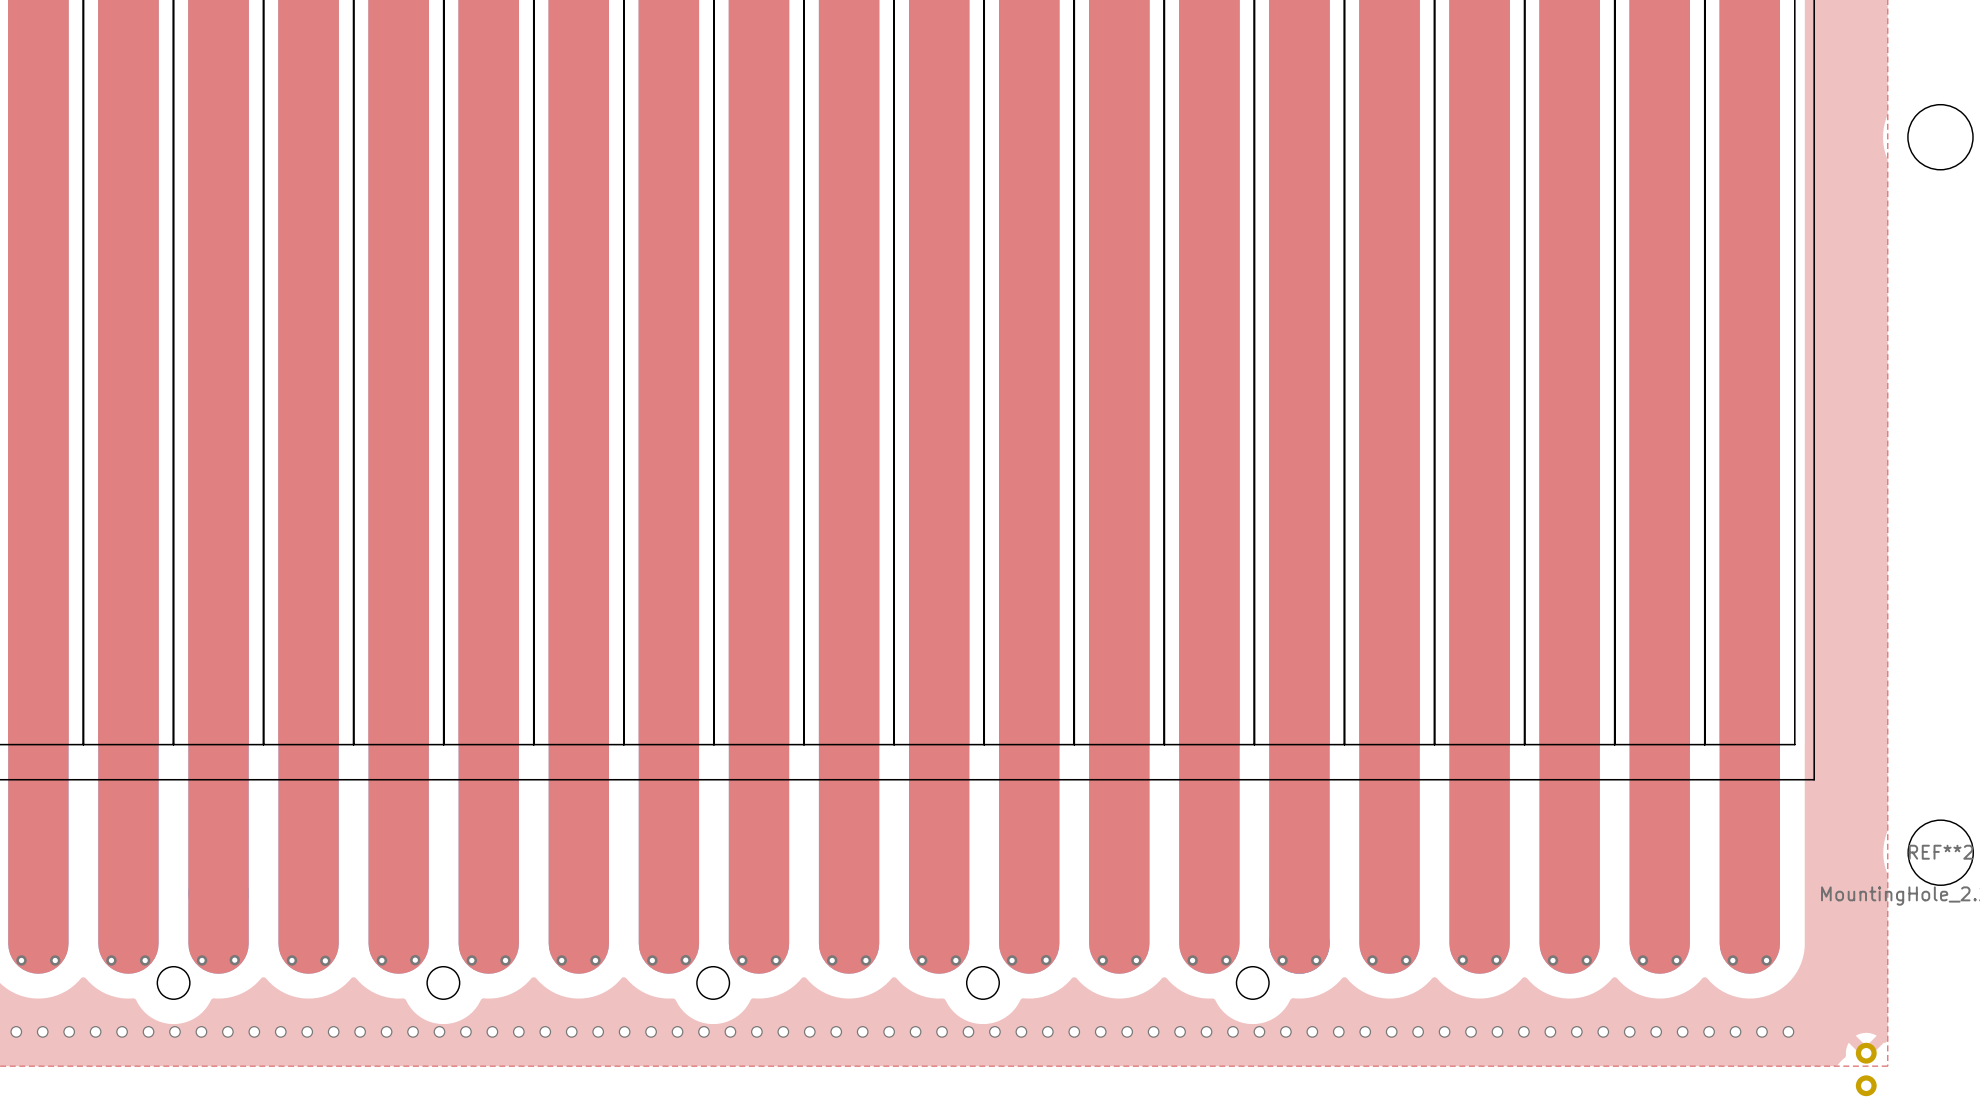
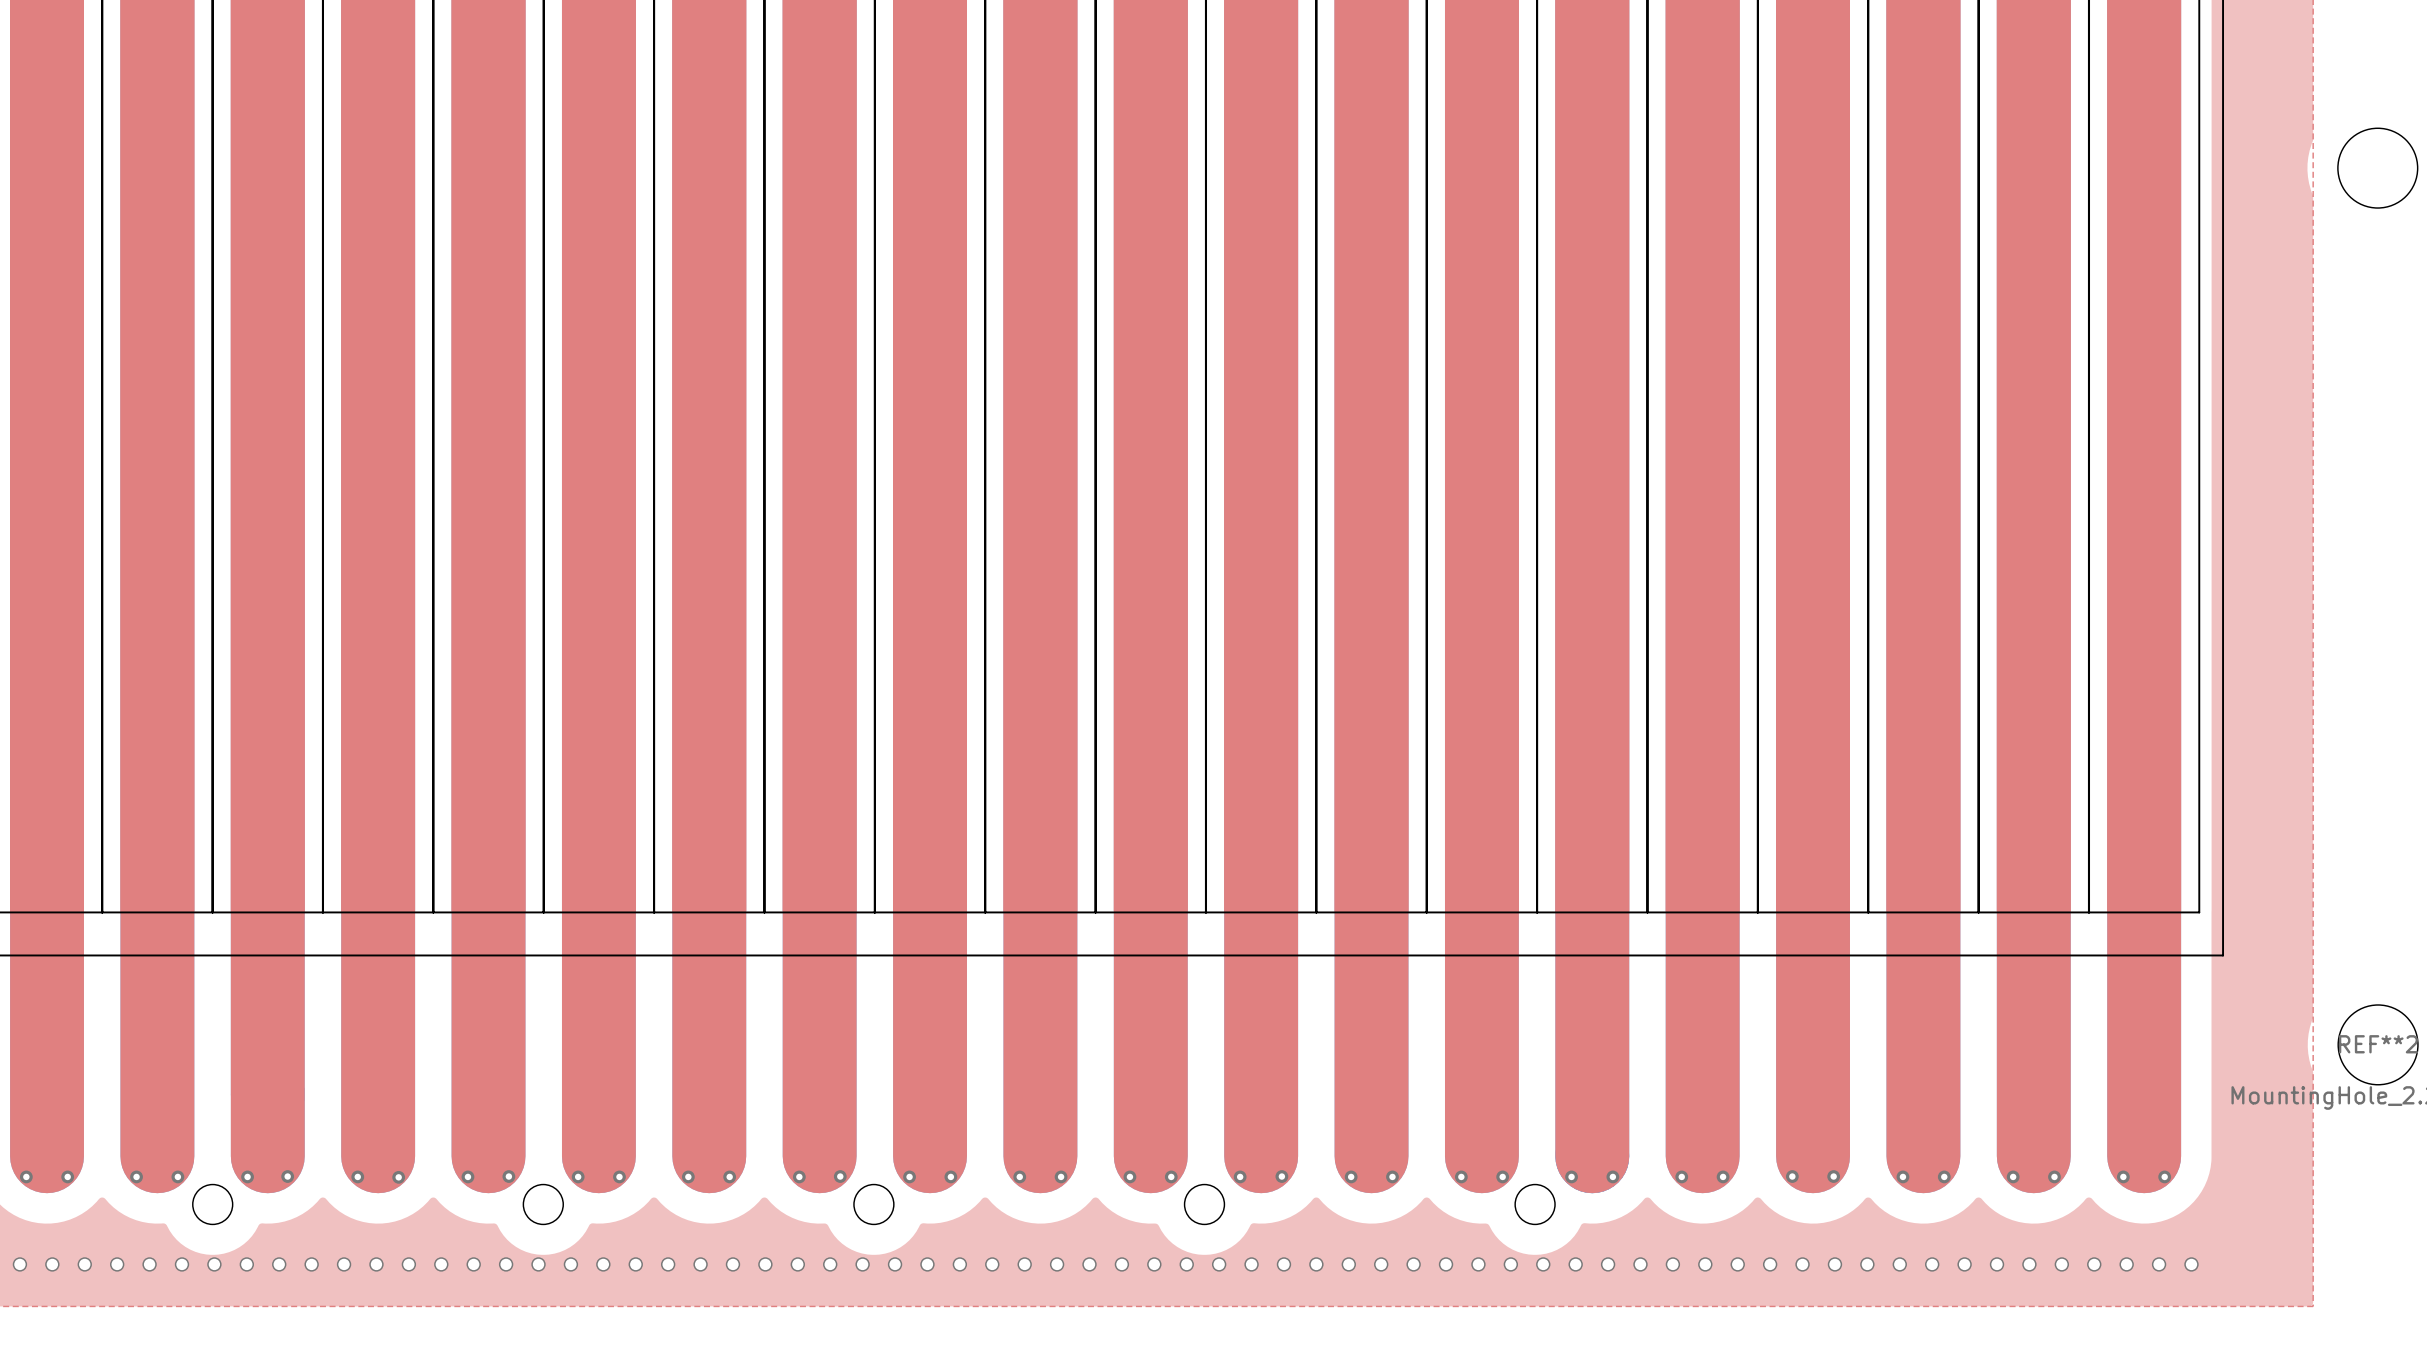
part: (1866, 1069) -> none

